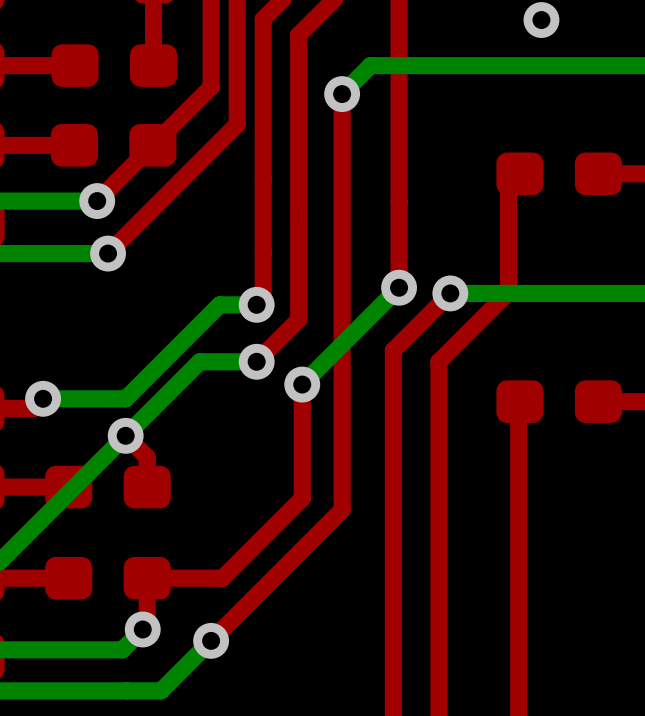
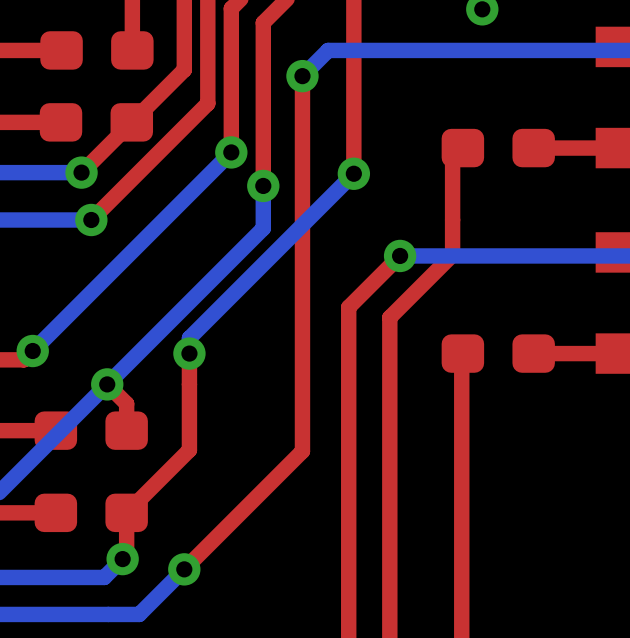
top track: (263, 178) (263, 298) (256, 304) -> none
via: none -> (231, 152)
bottom track: none -> (353, 173) (189, 338) (189, 353)
top track: (399, 202) (399, 287) -> none
via: none -> (353, 173)
top track: (298, 215) (298, 319) (256, 361) -> none
via: none -> (263, 185)
bottom track: (399, 287) (302, 384) -> none
via: (399, 287) -> none
bottom track: (256, 304) (219, 304) (125, 398) (43, 398) -> (231, 152) (32, 351)
via: (256, 304) -> none
bottom track: (256, 361) (199, 361) -> (263, 185) (263, 228) (174, 317)
via: (256, 361) -> none
top track: (302, 384) (302, 498) (222, 578) (147, 578) -> (189, 353) (189, 450) (126, 512)
via: (302, 384) -> none
via: none -> (189, 353)

